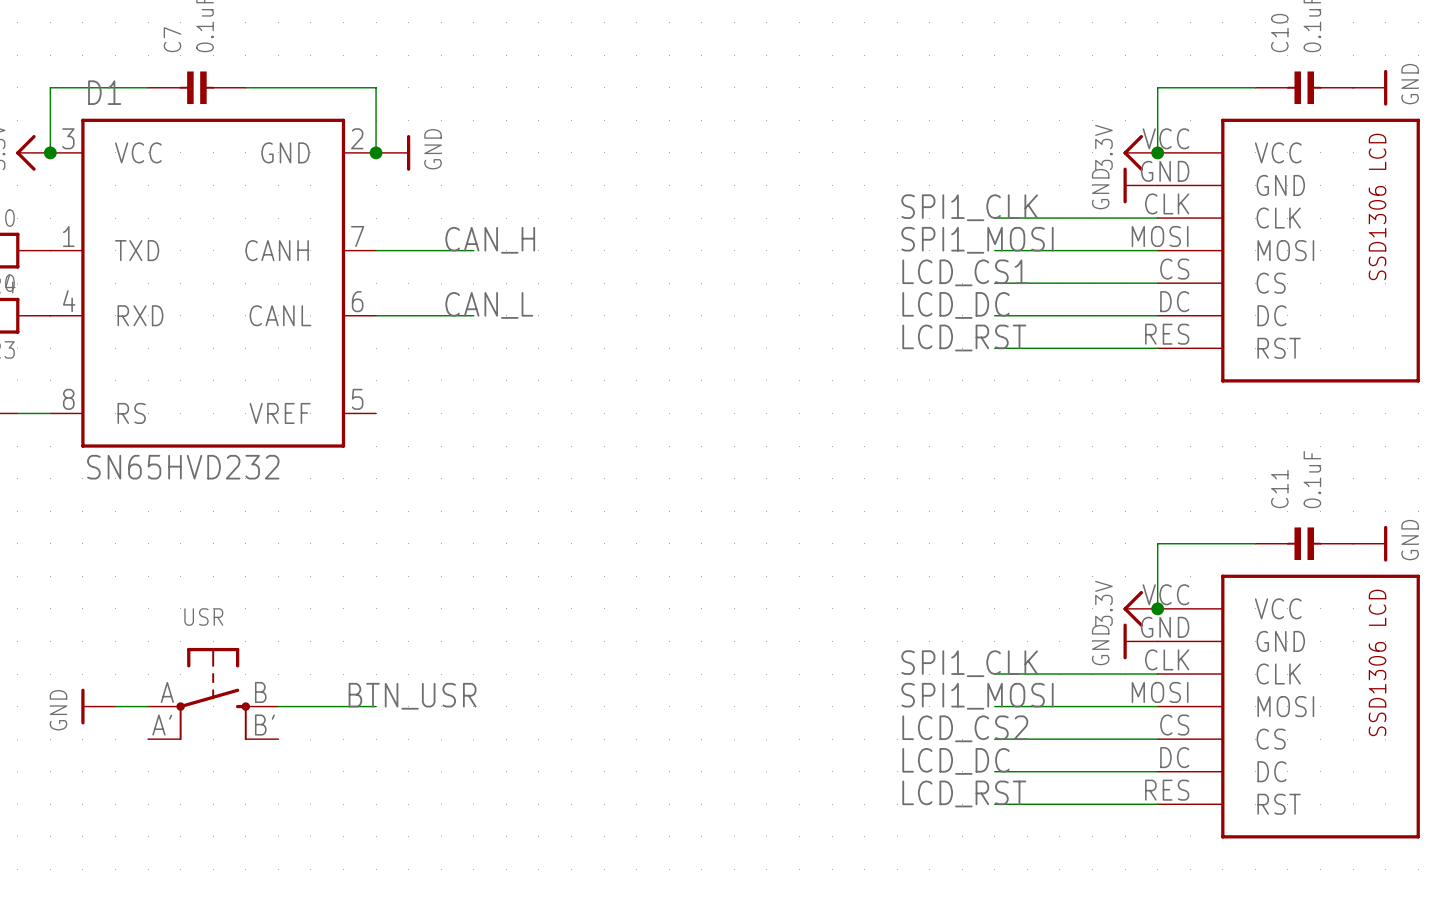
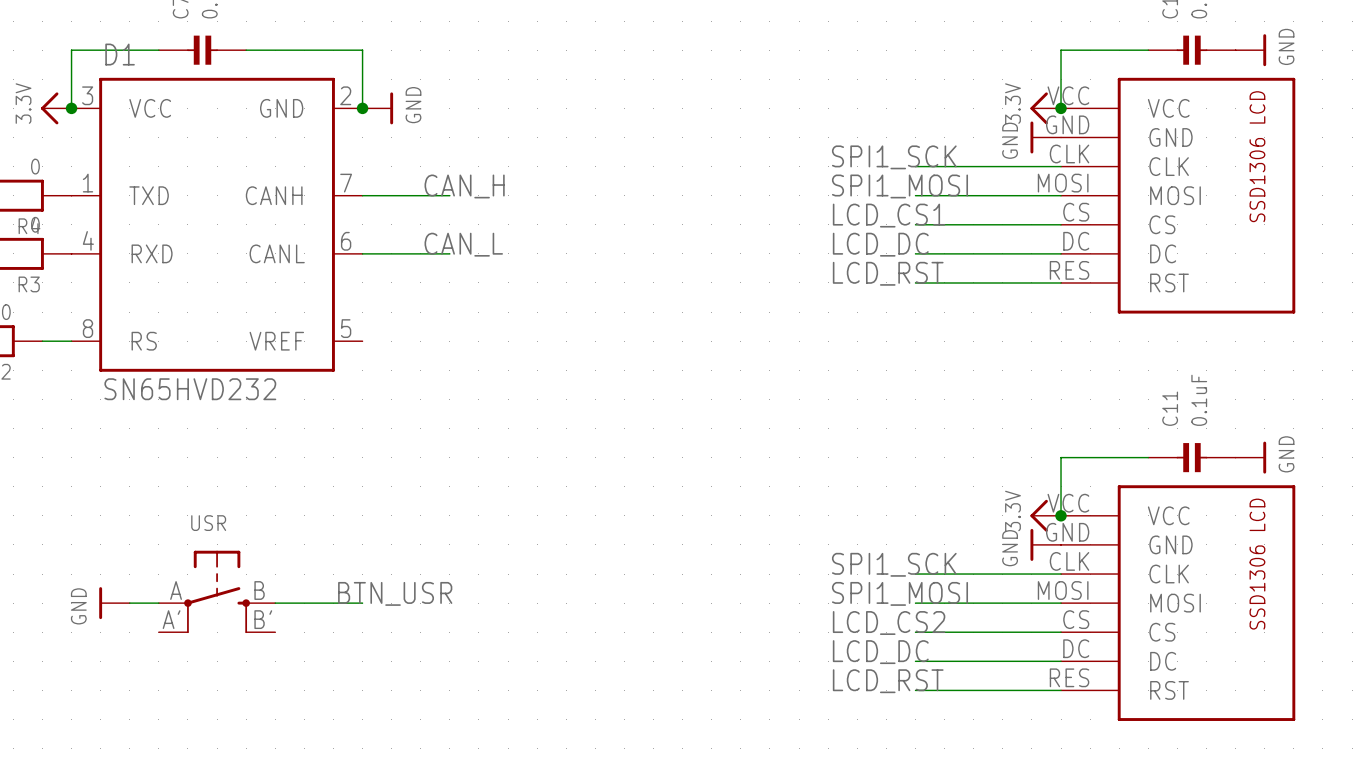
label: SPI1_CLK (969, 207) -> SPI1_SCK (894, 157)
label: SPI1_CLK (969, 663) -> SPI1_SCK (894, 564)

